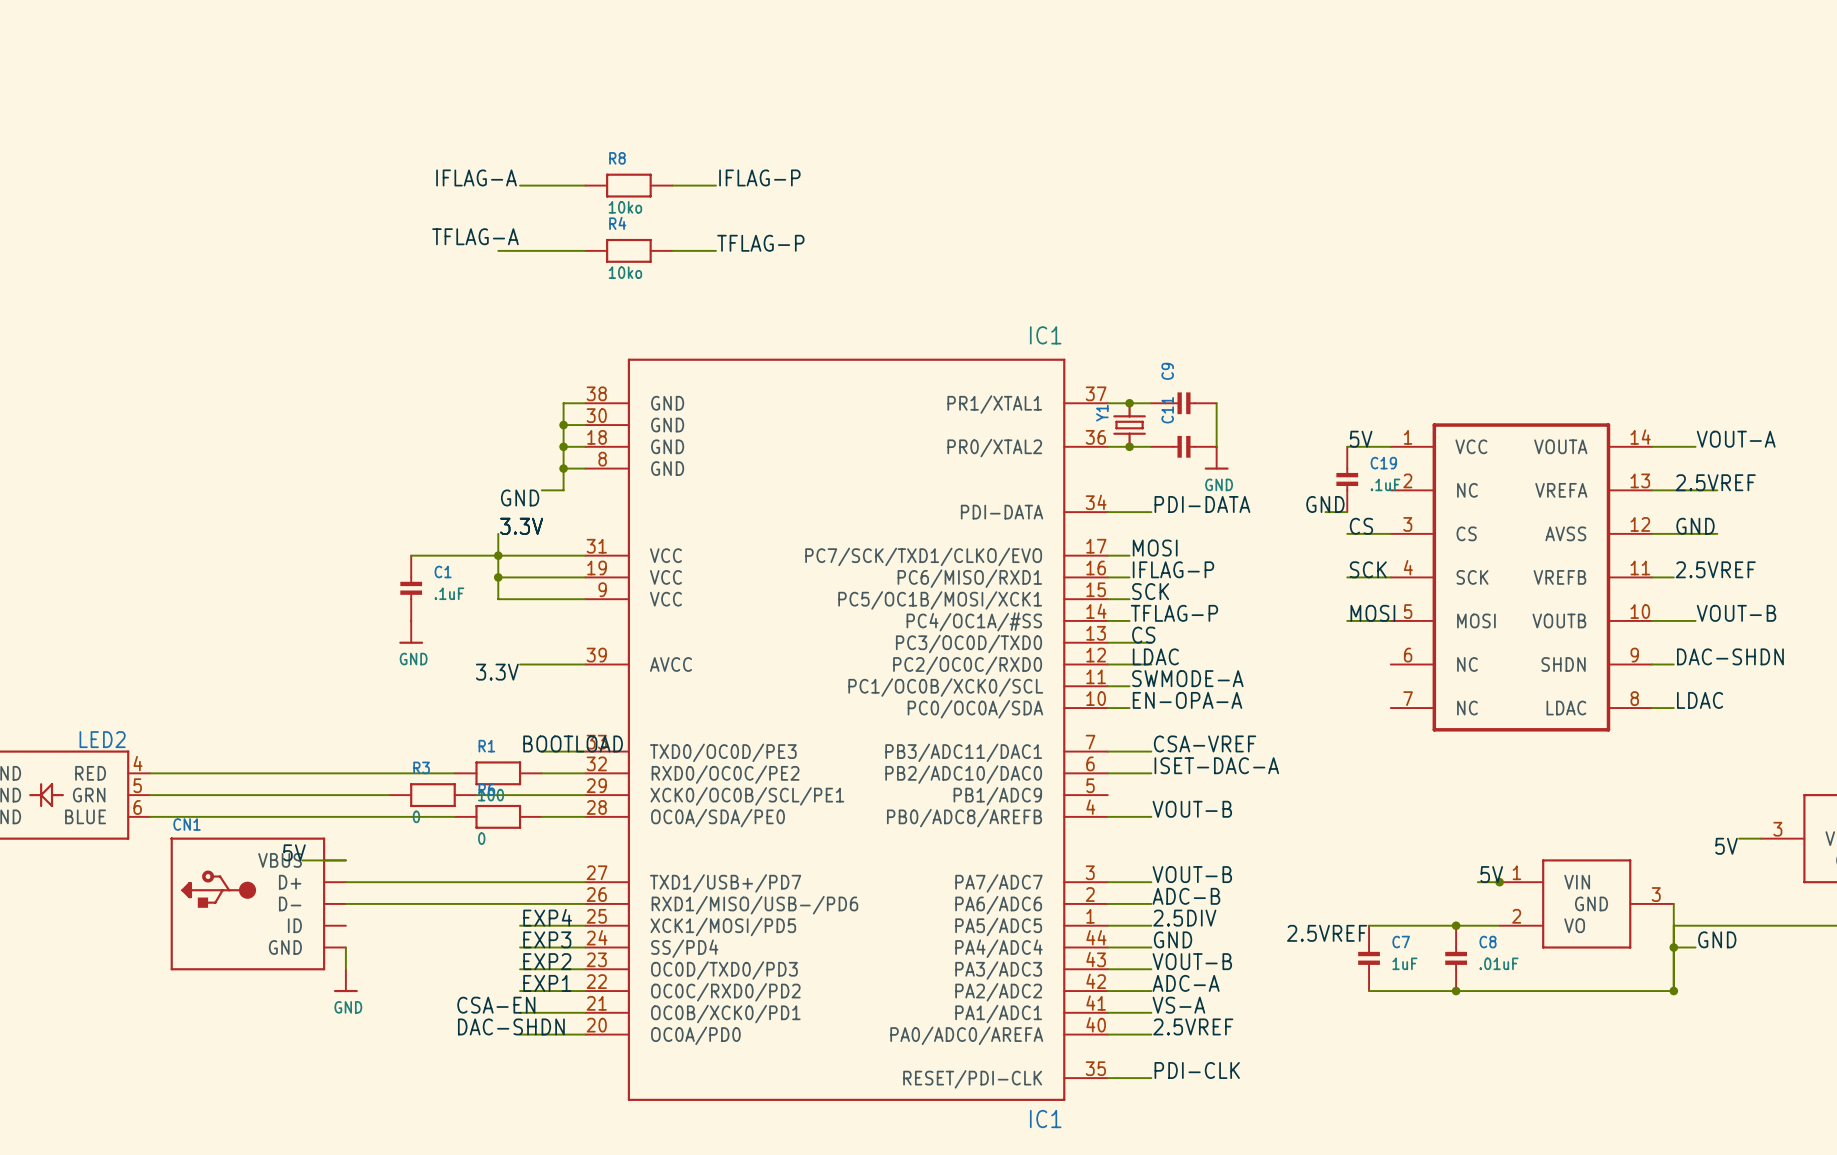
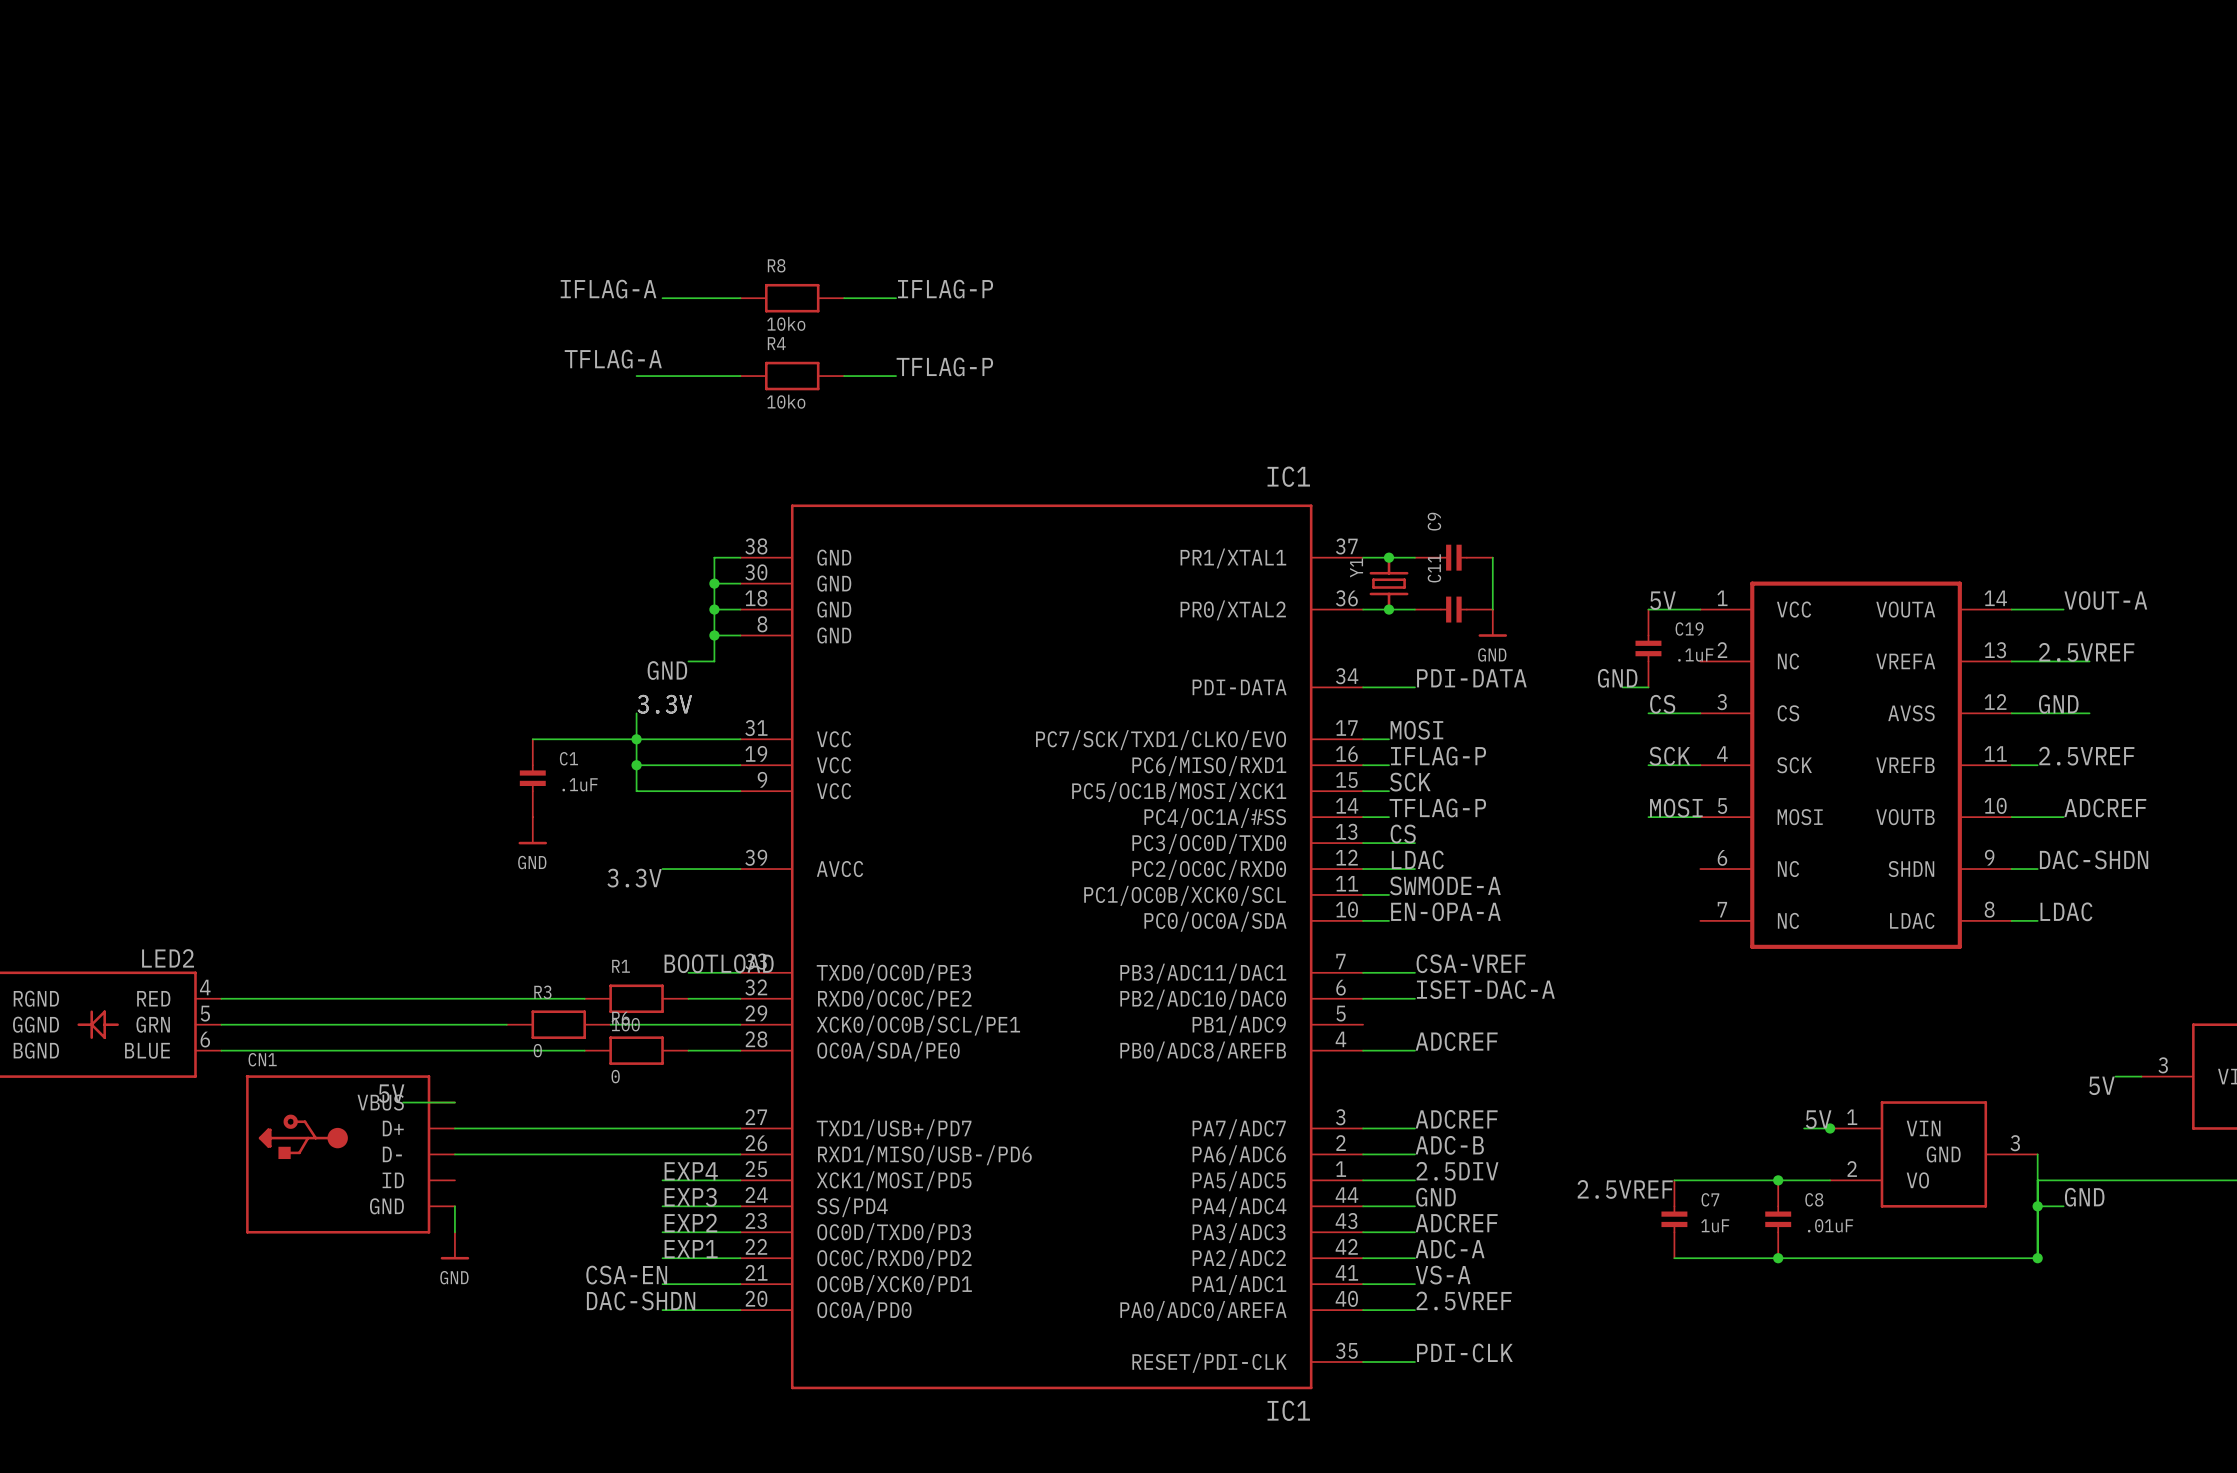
label: VOUT-B (1736, 613) -> ADCREF (2105, 808)
label: VOUT-B (1192, 809) -> ADCREF (1456, 1041)
label: VOUT-B (1192, 874) -> ADCREF (1456, 1119)
label: VOUT-B (1192, 961) -> ADCREF (1456, 1223)

